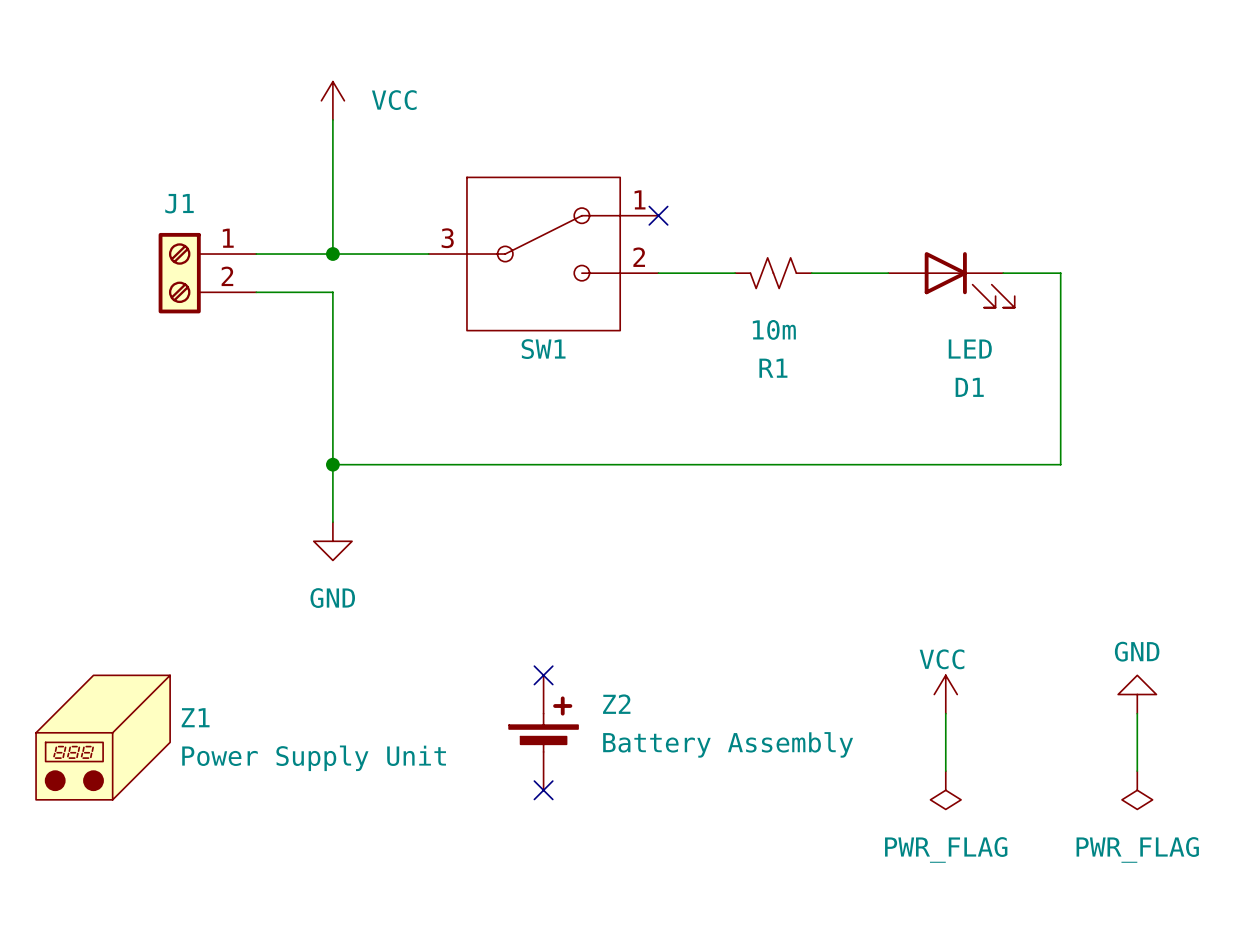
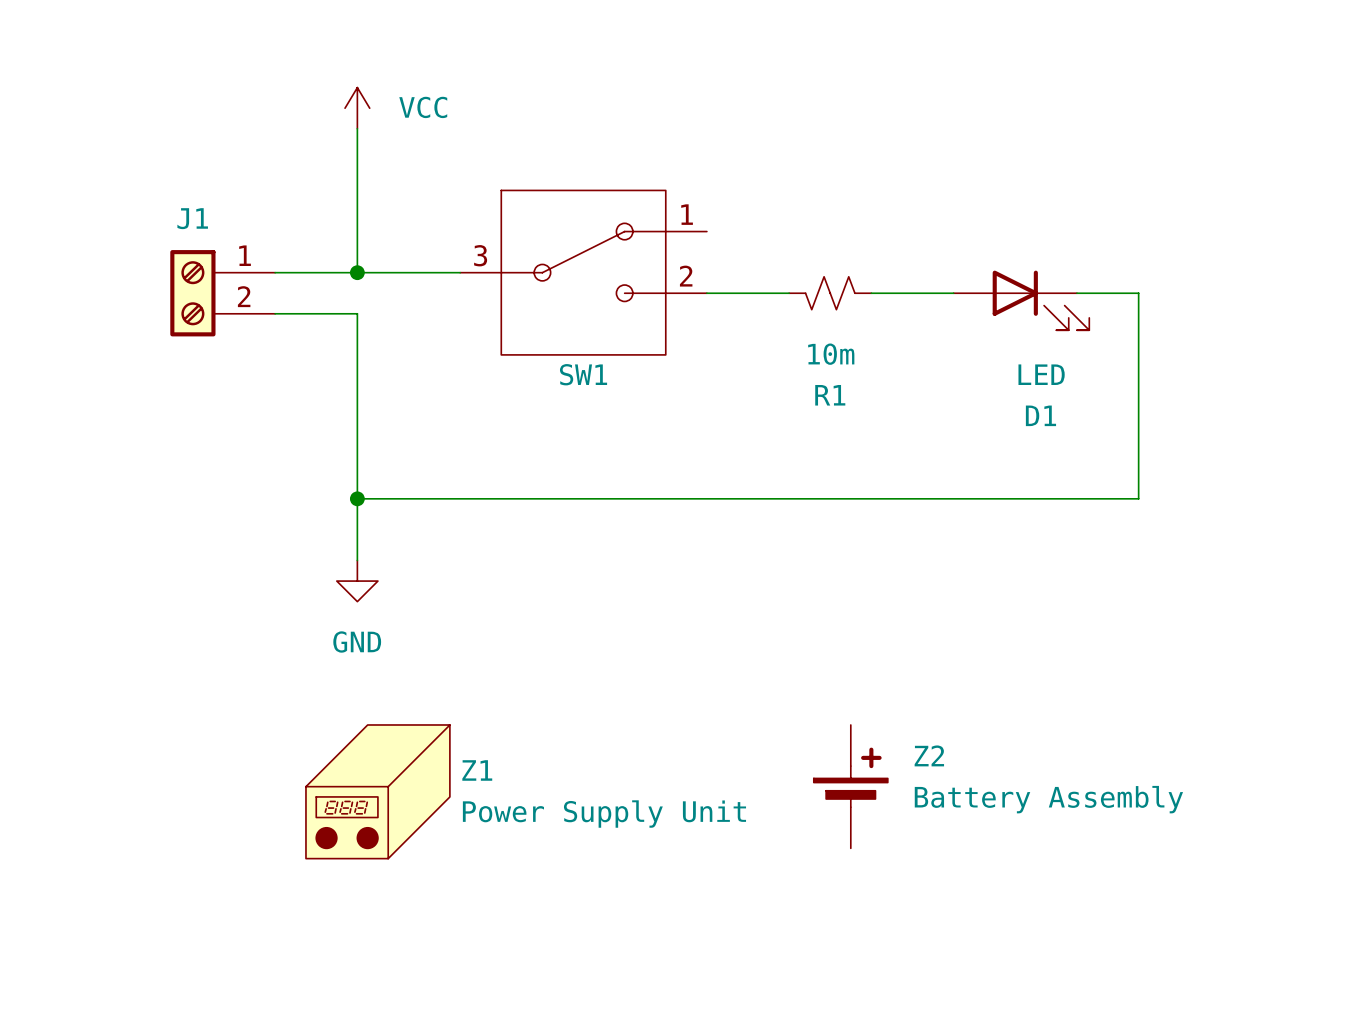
no-connect mark: (658, 215) -> none
no-connect mark: (543, 675) -> none
power symbol: VCC (945, 694) -> none
power symbol: GND (1137, 694) -> none
wire: (945, 713) (945, 771) -> none
wire: (1137, 713) (1137, 771) -> none
Z2 position: (543, 732) -> (850, 786)
Z1 position: (103, 737) -> (377, 791)
no-connect mark: (543, 790) -> none
power symbol: PWR_FLAG (945, 790) -> none
power symbol: PWR_FLAG (1137, 790) -> none

